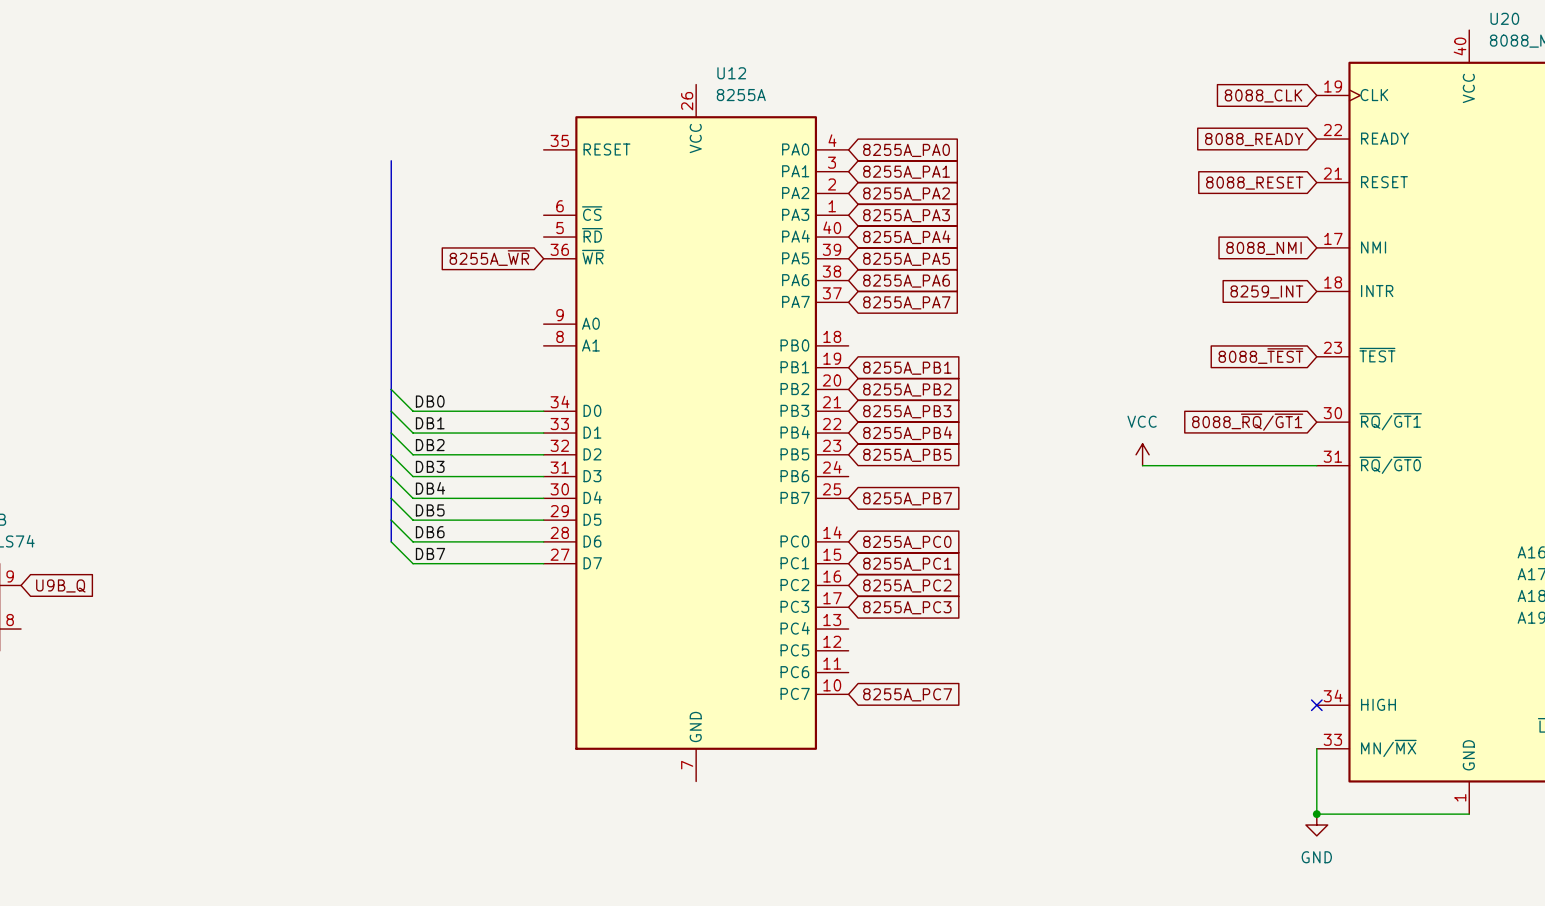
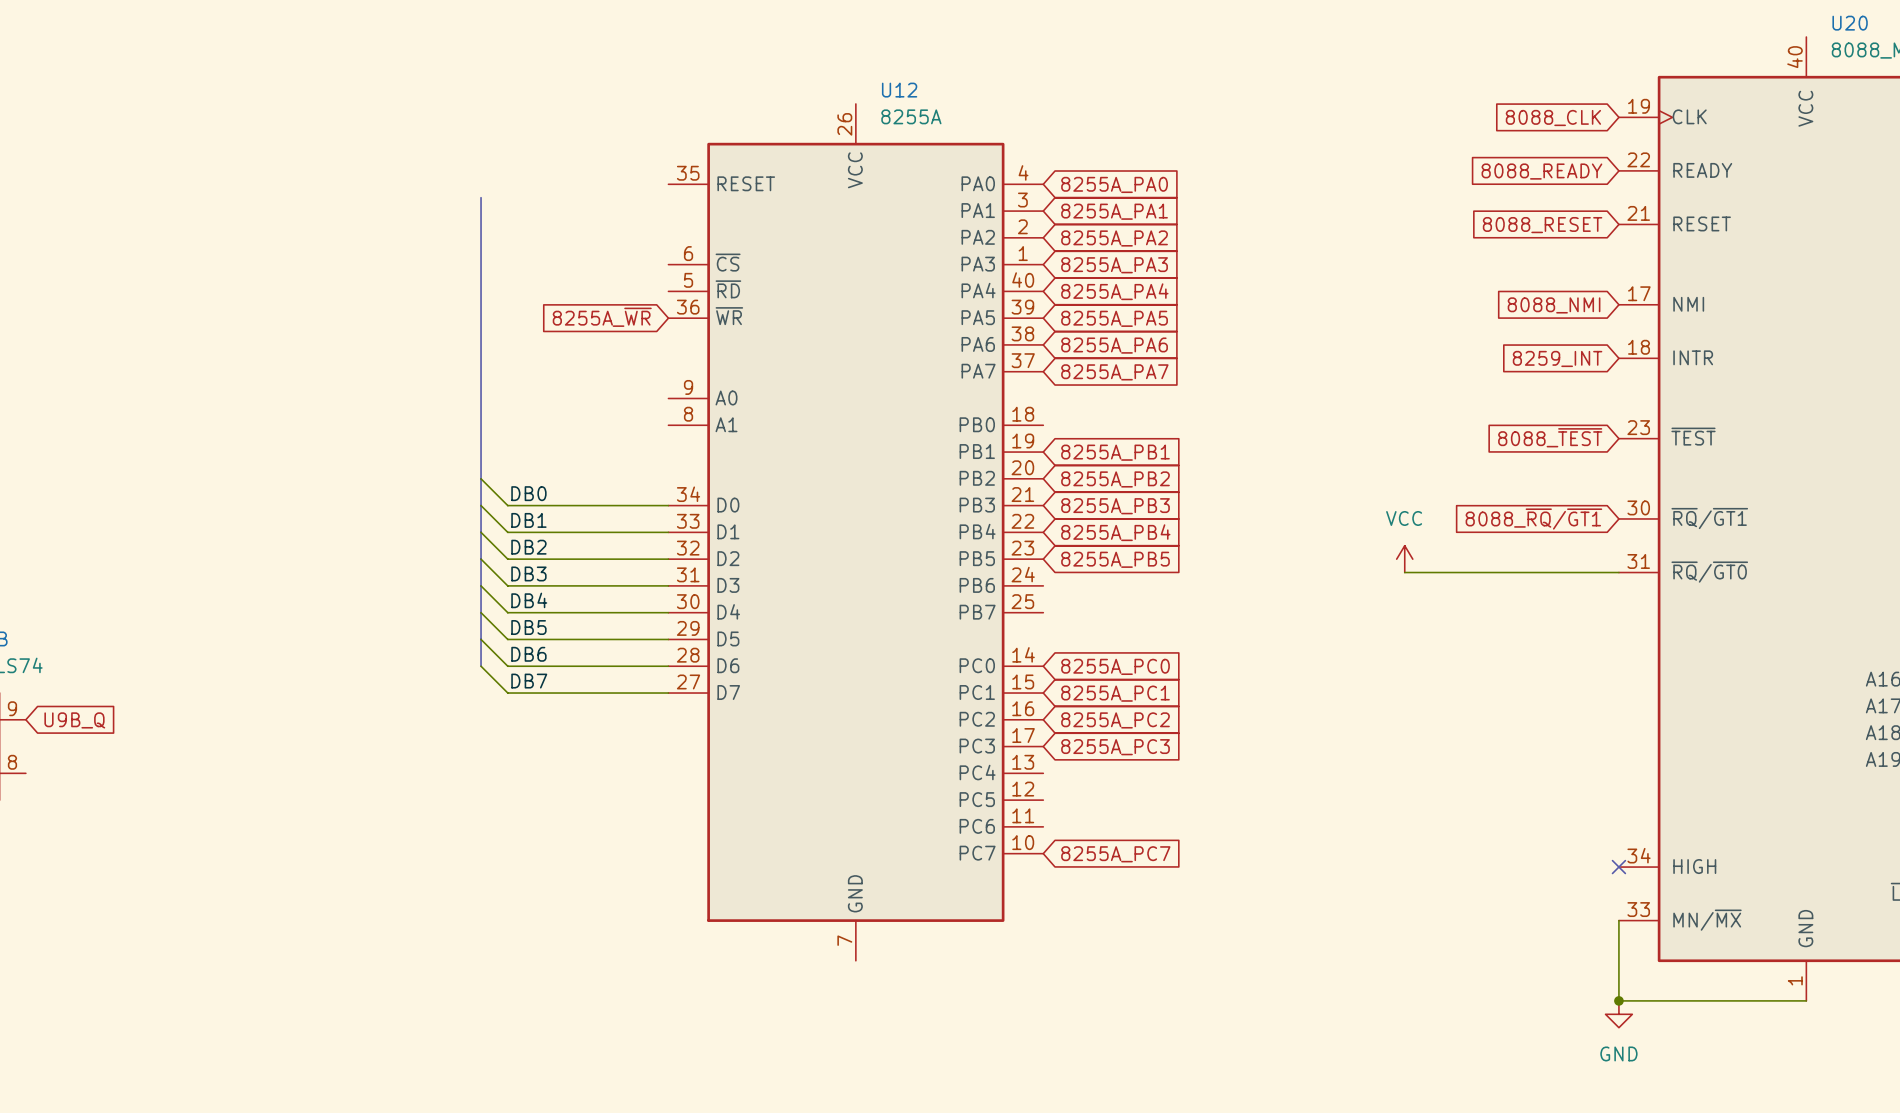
global label: 8255A_PB7 (907, 498) -> none

